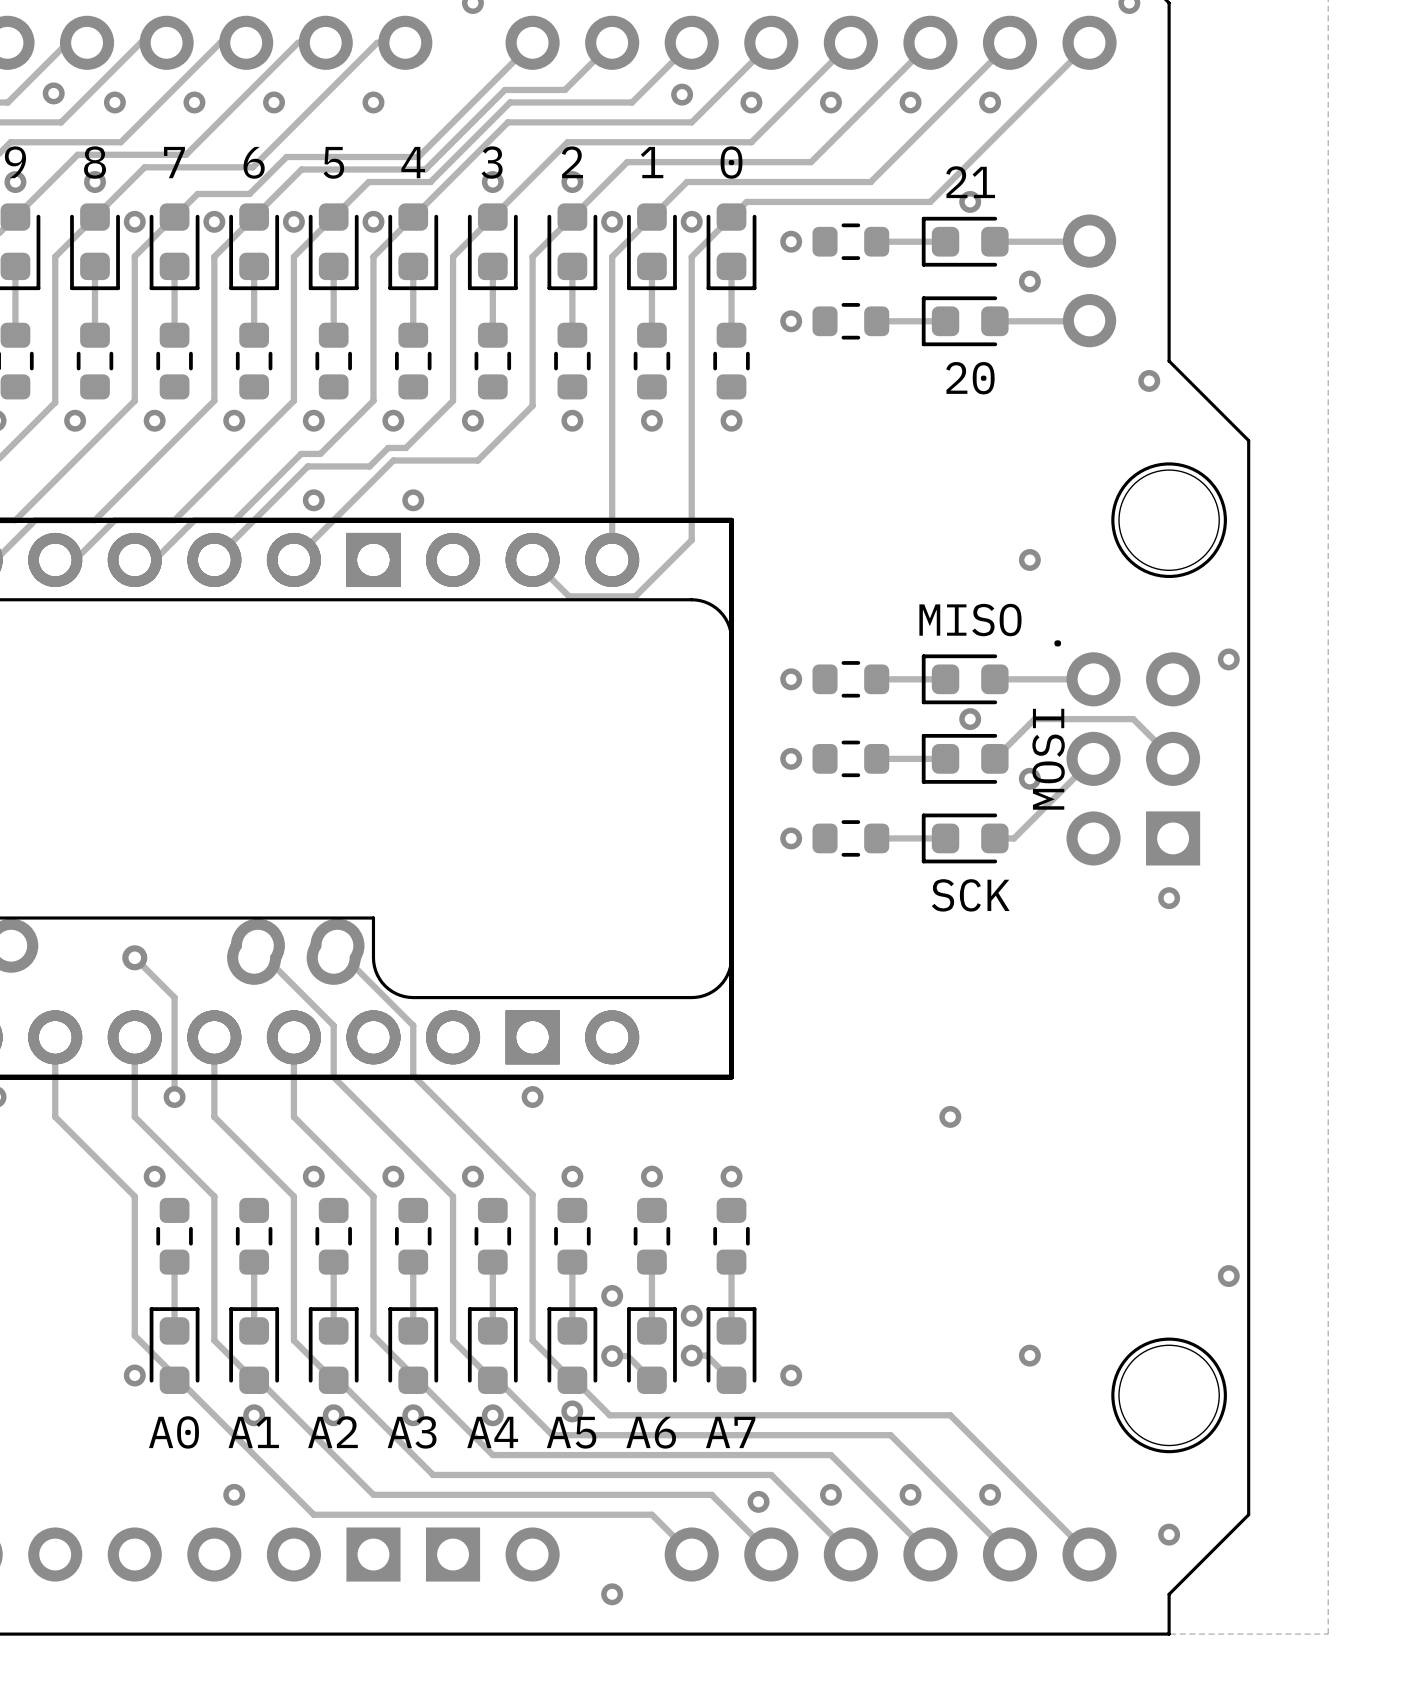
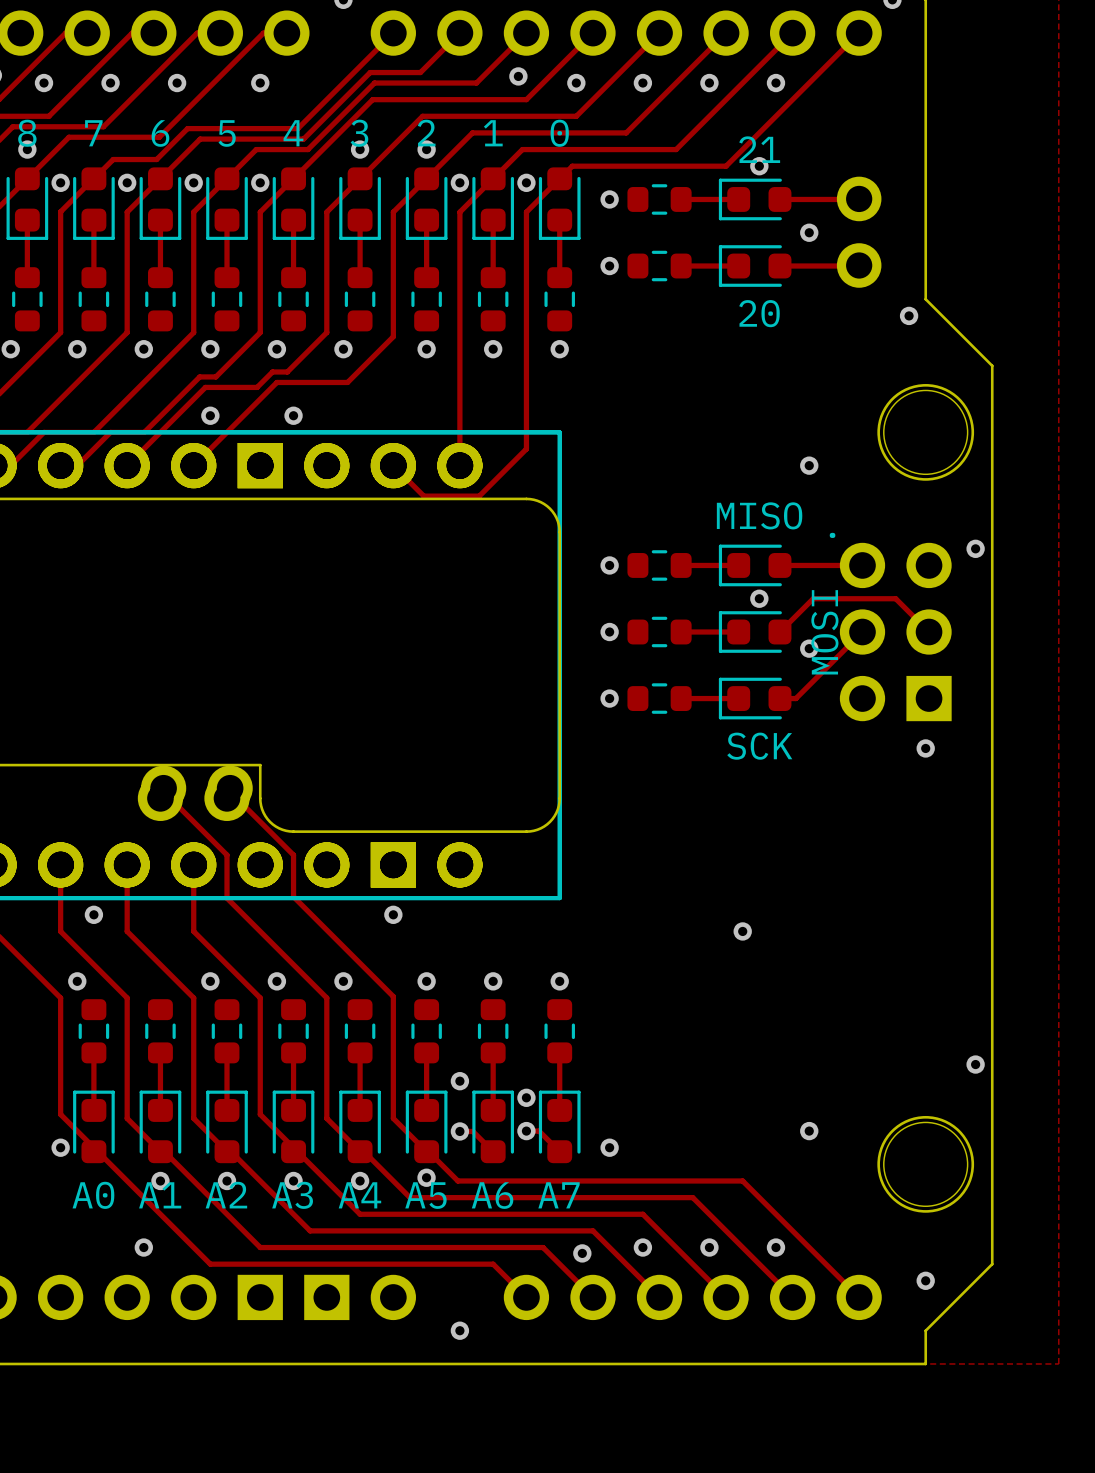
track: (134, 957) (174, 997) (174, 1097) -> none
via: (134, 957) -> none

